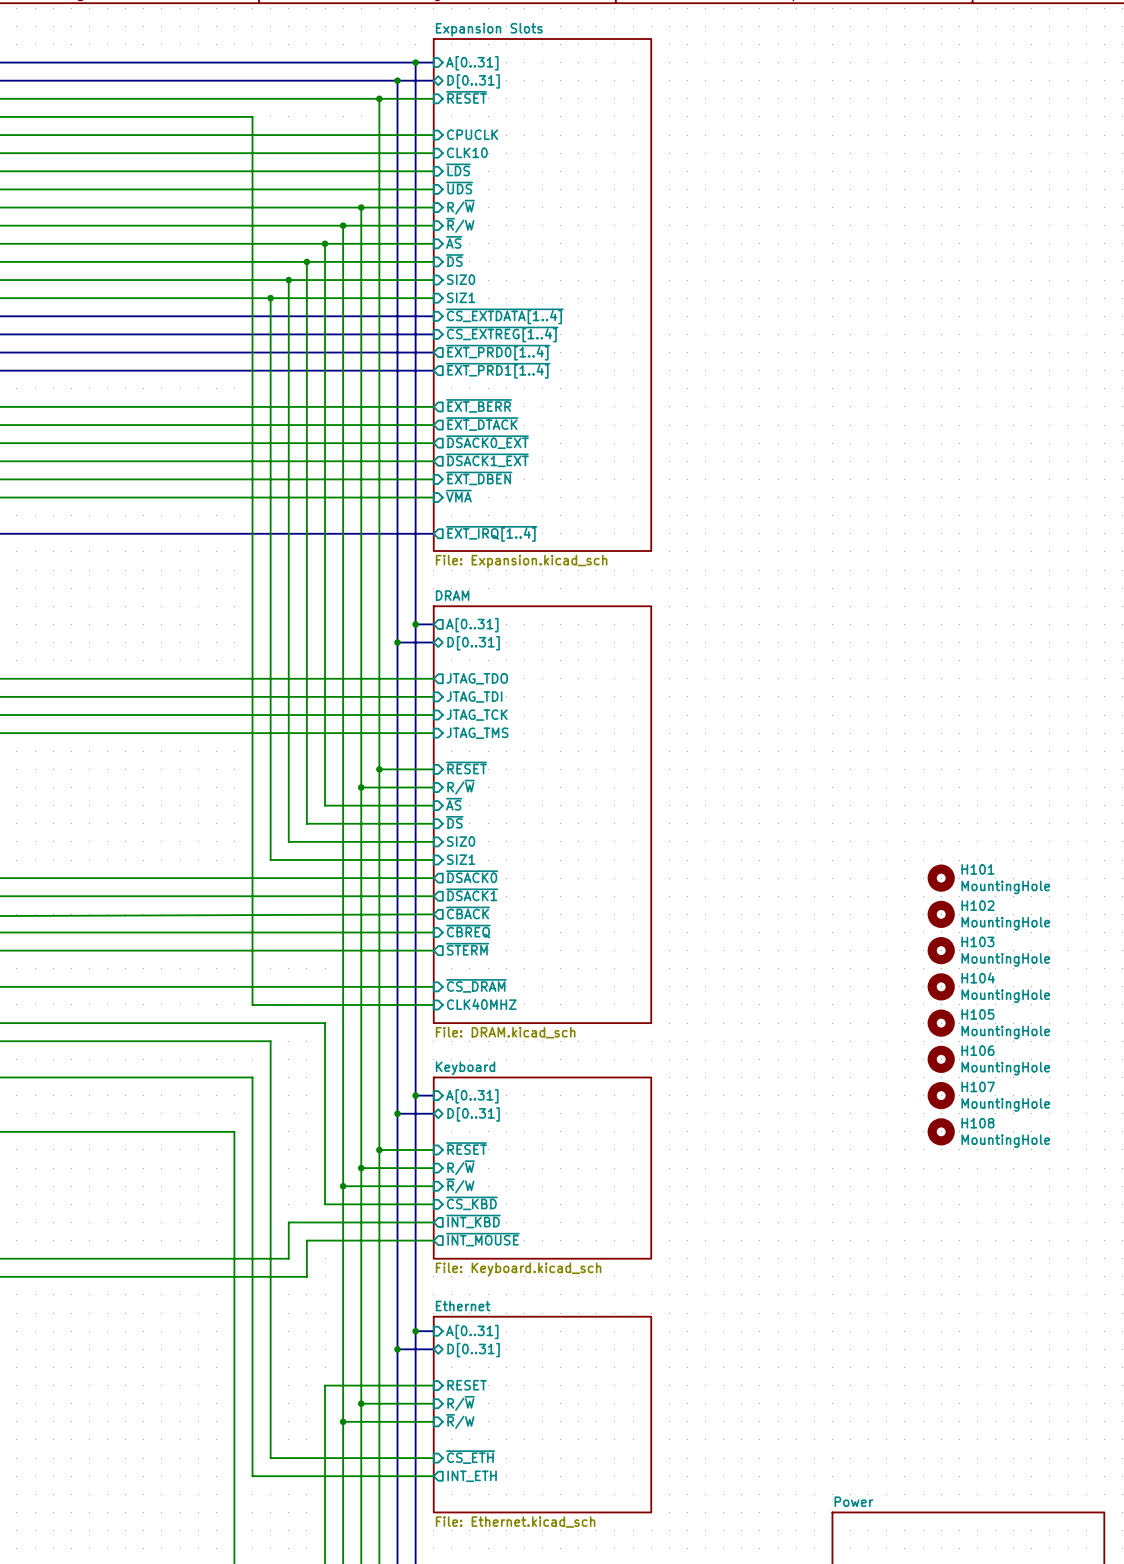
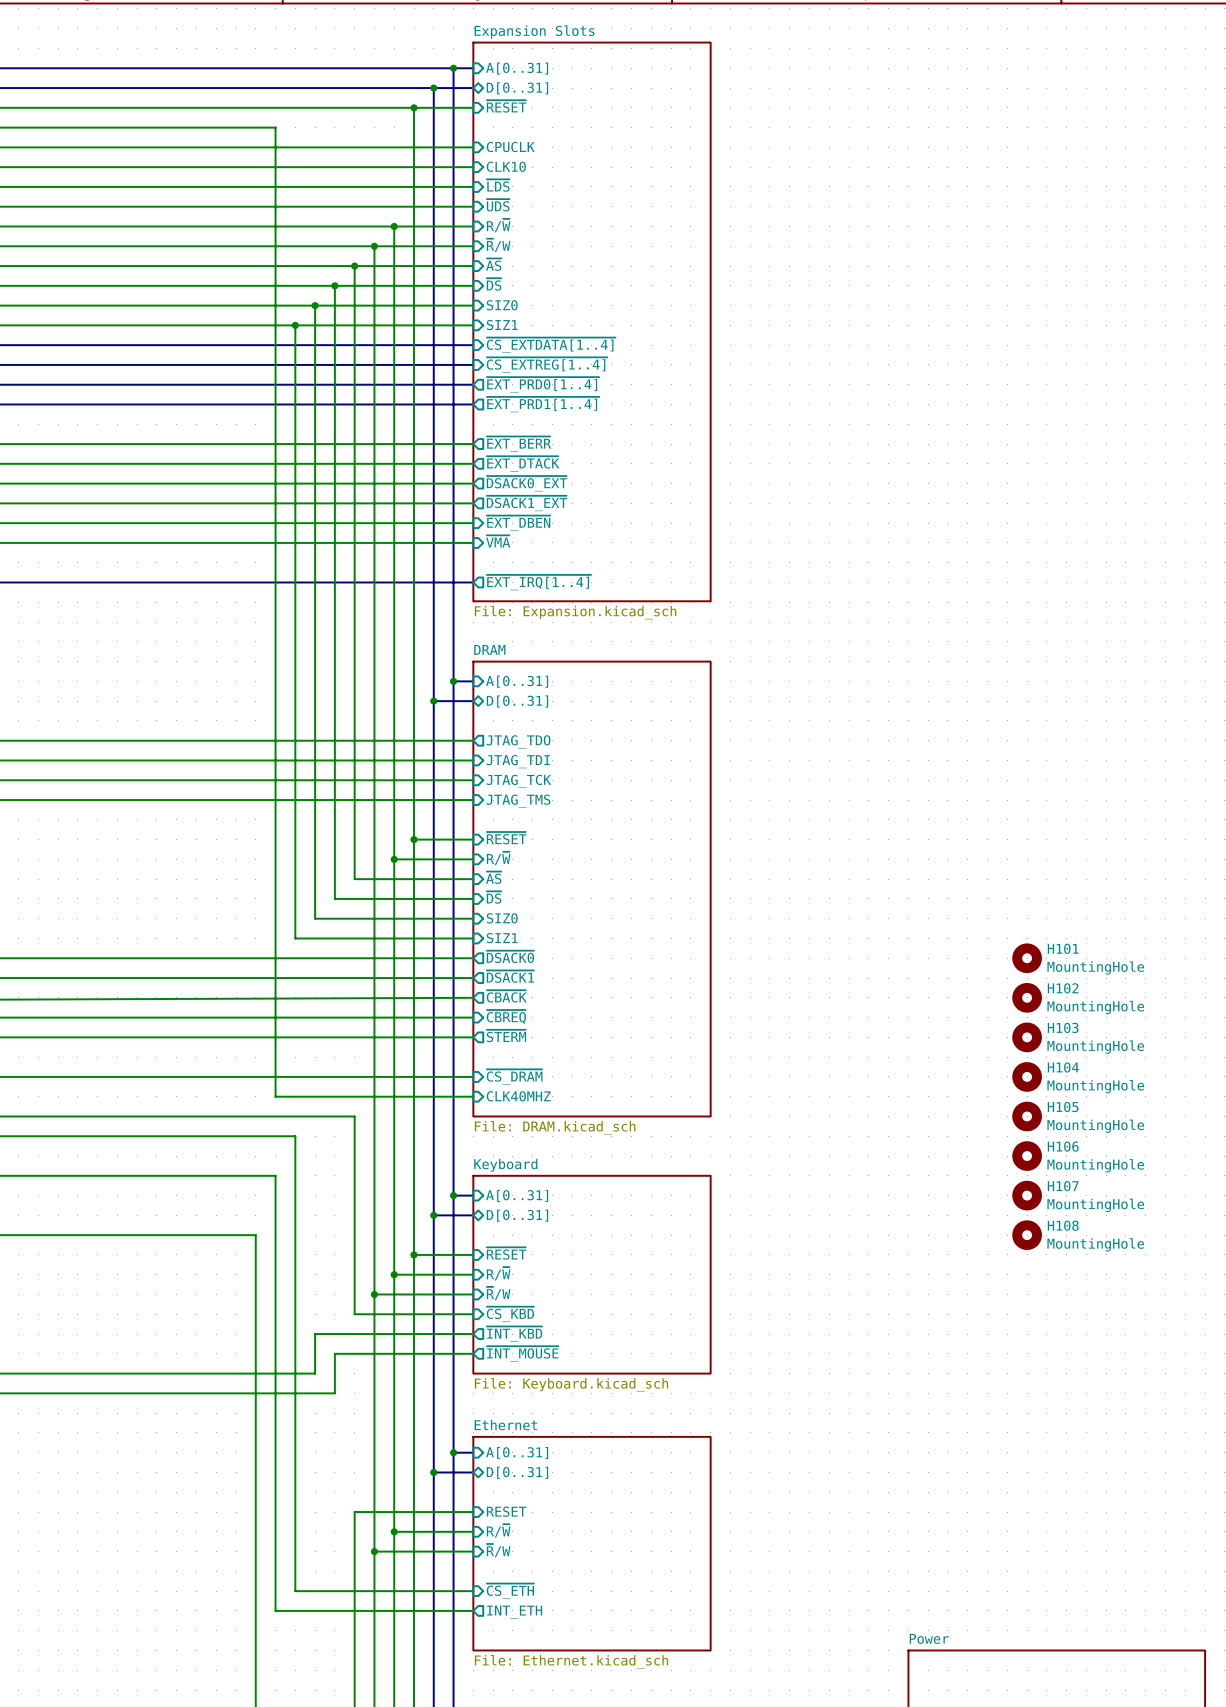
sheet pin shape: output (472, 625) -> input (517, 681)

